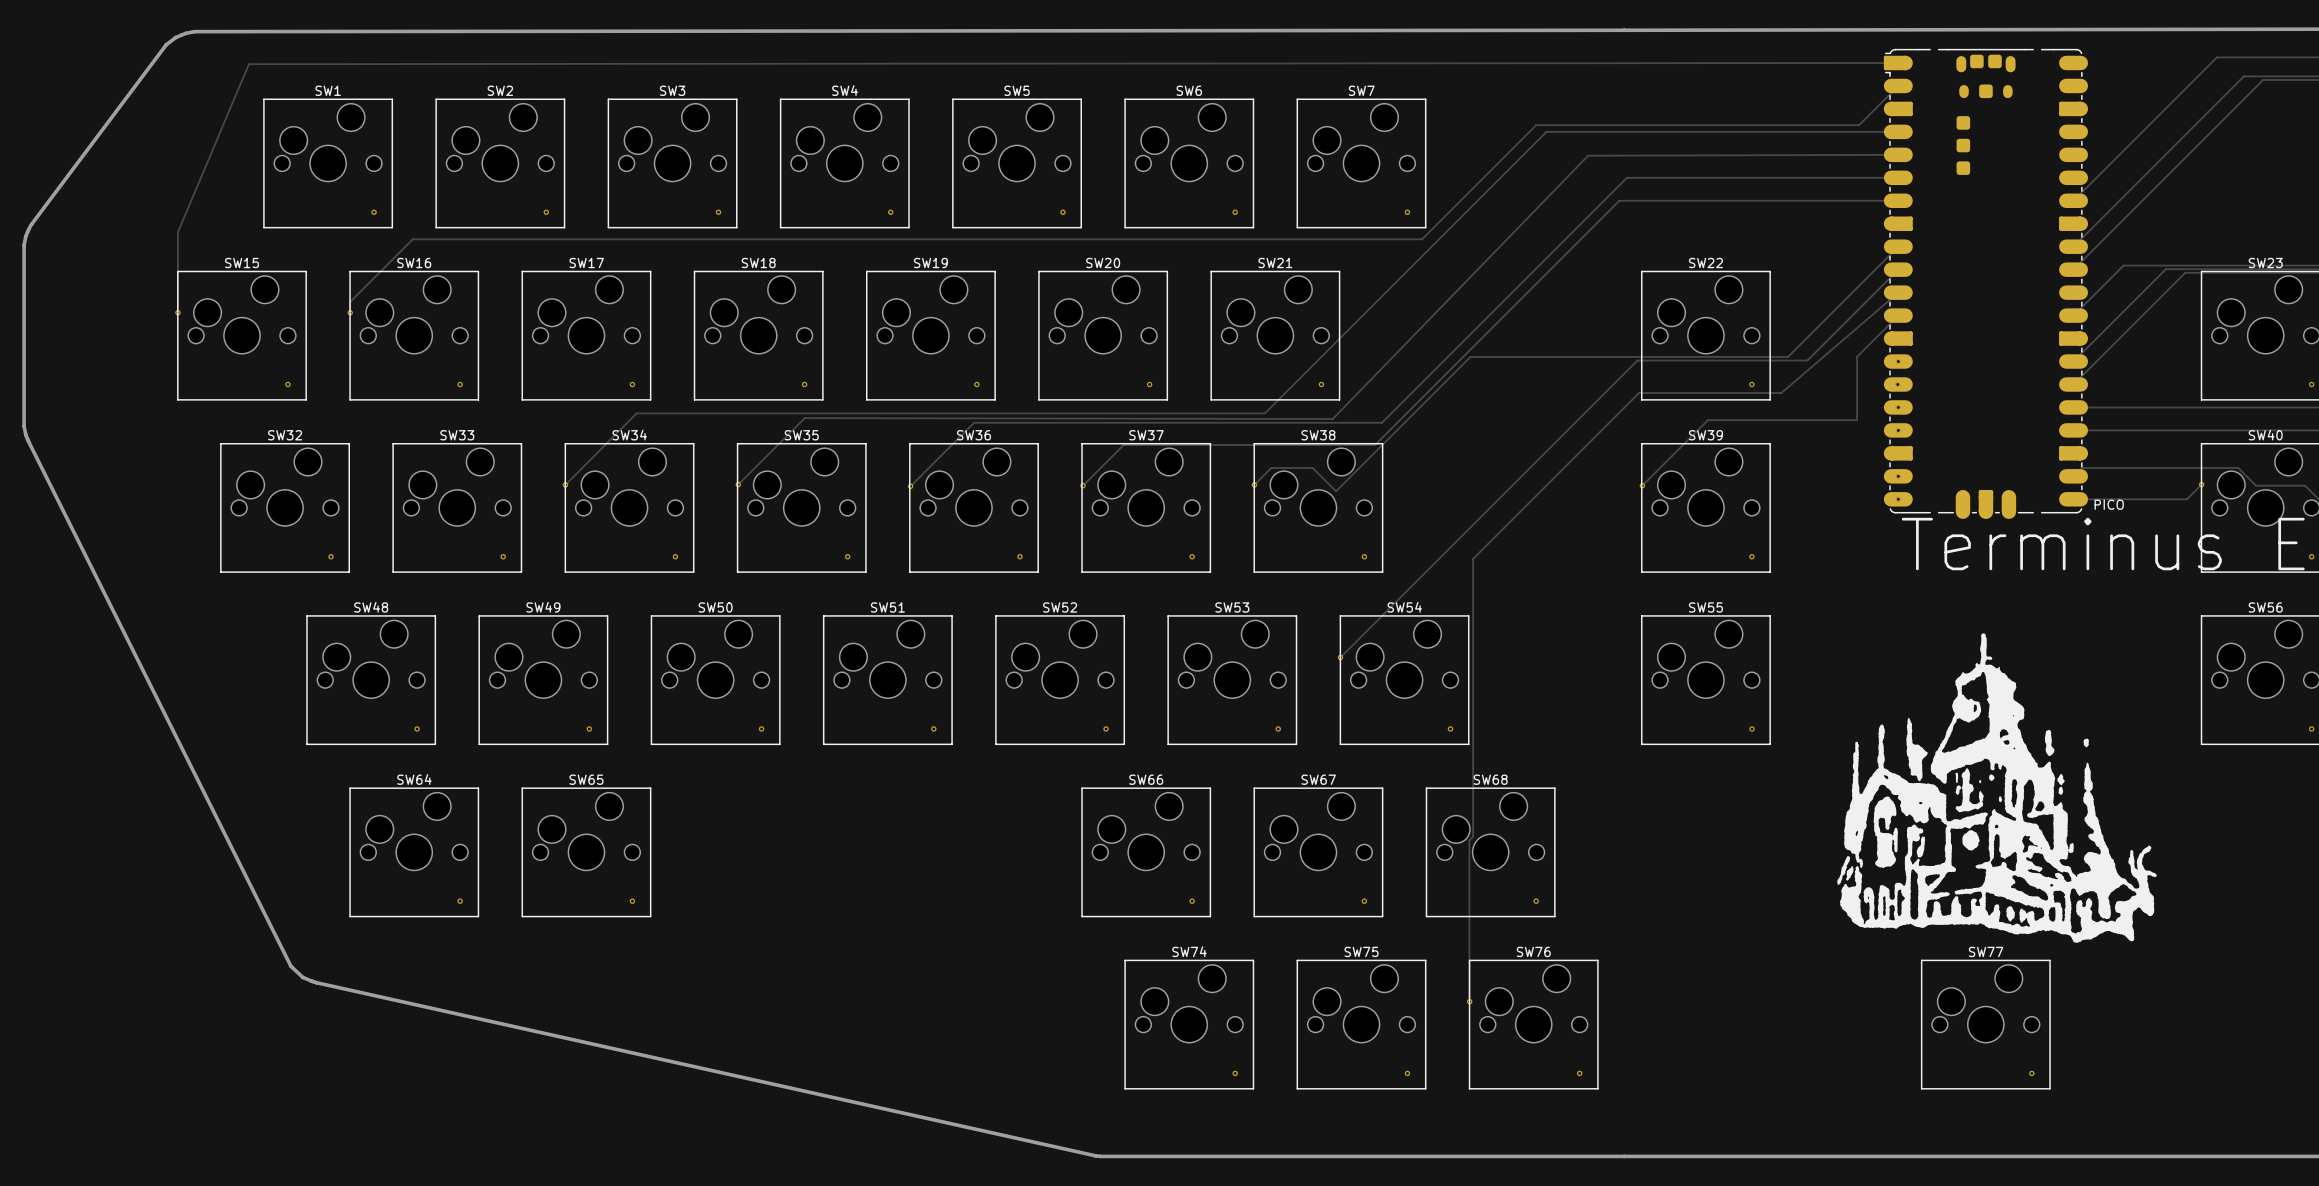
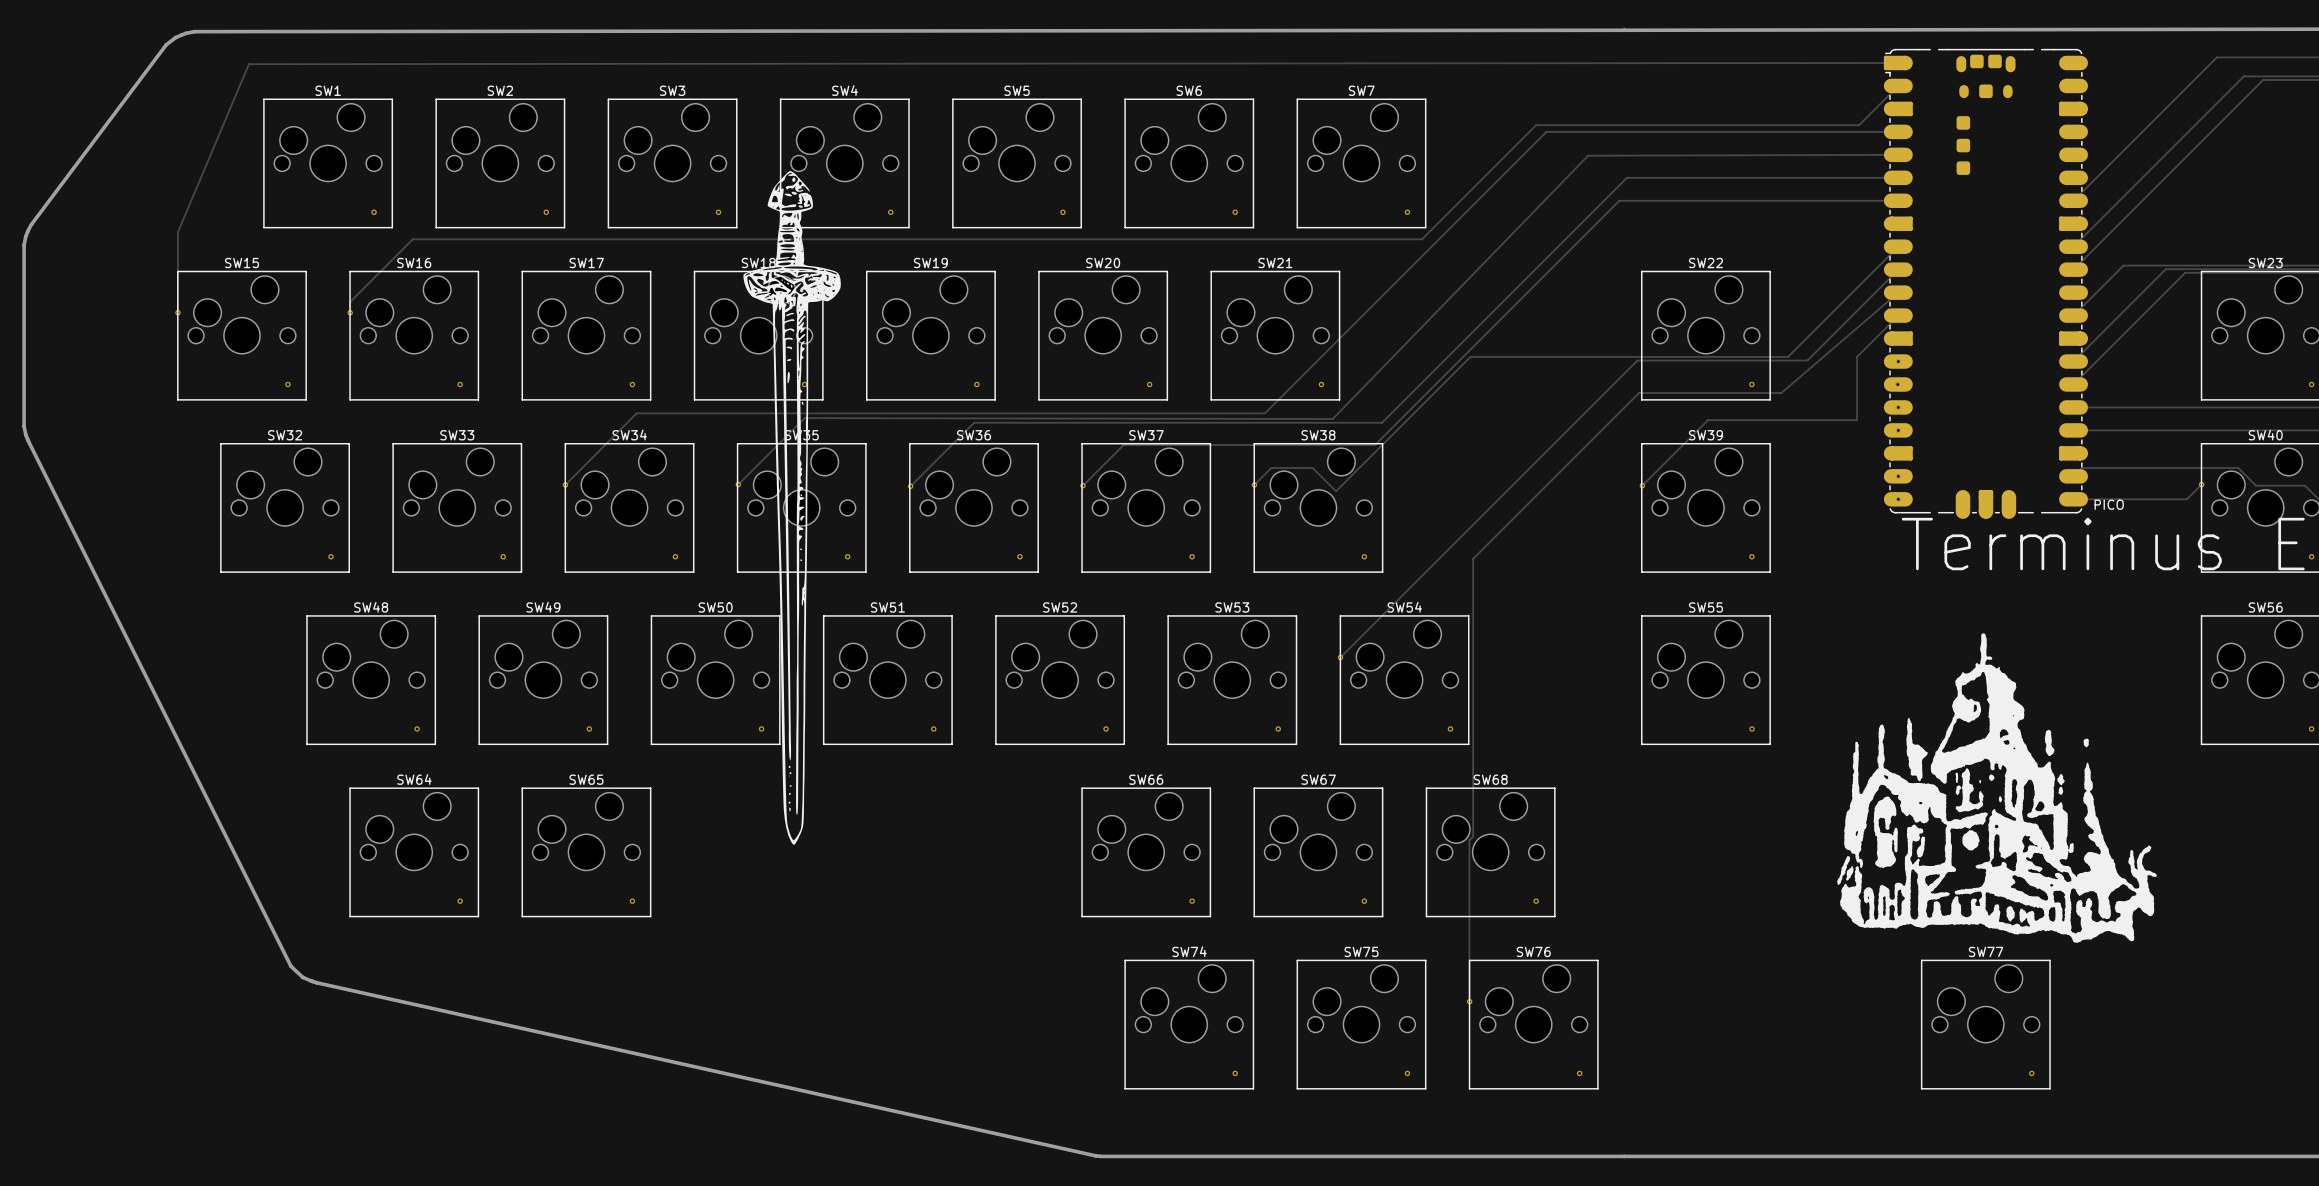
drawing: none -> [743, 171, 841, 845]

